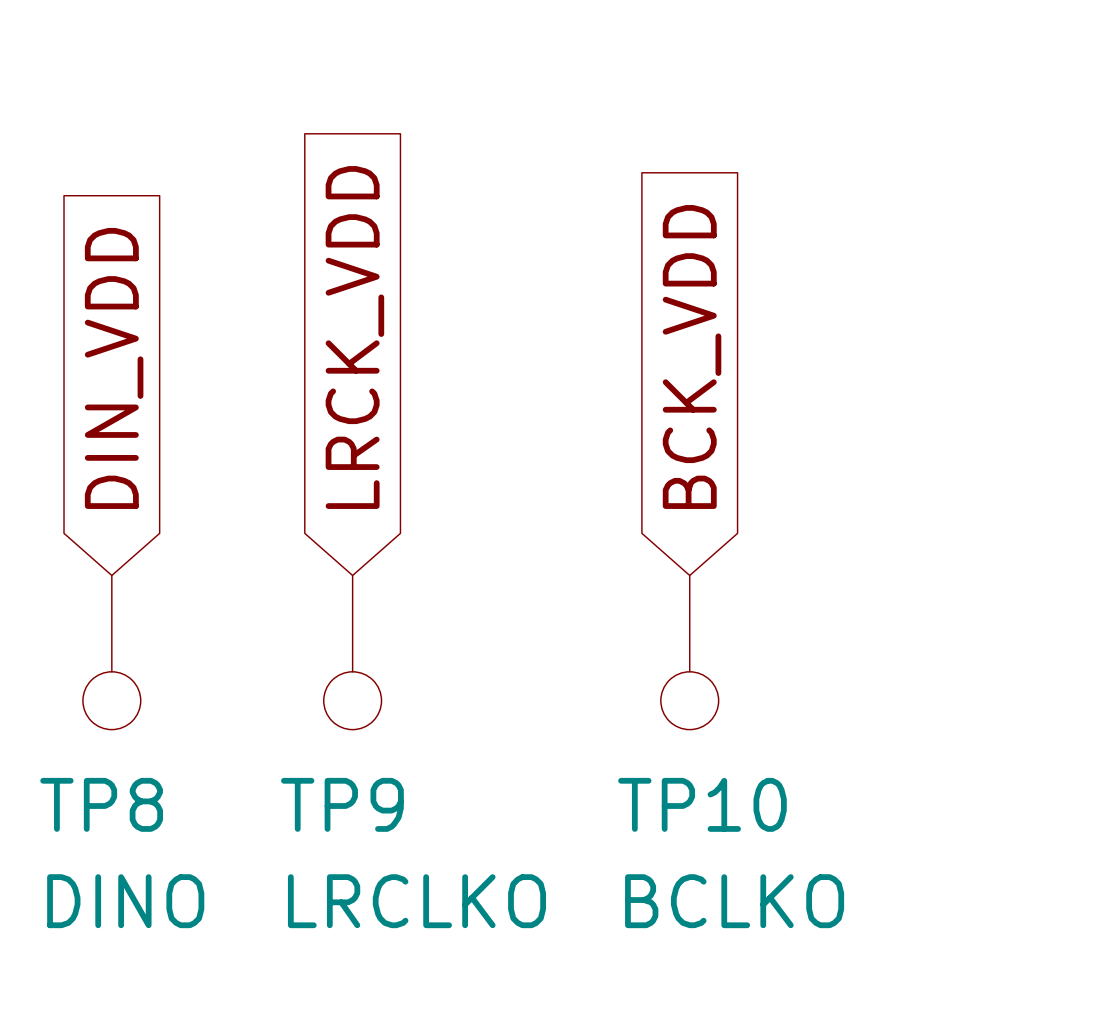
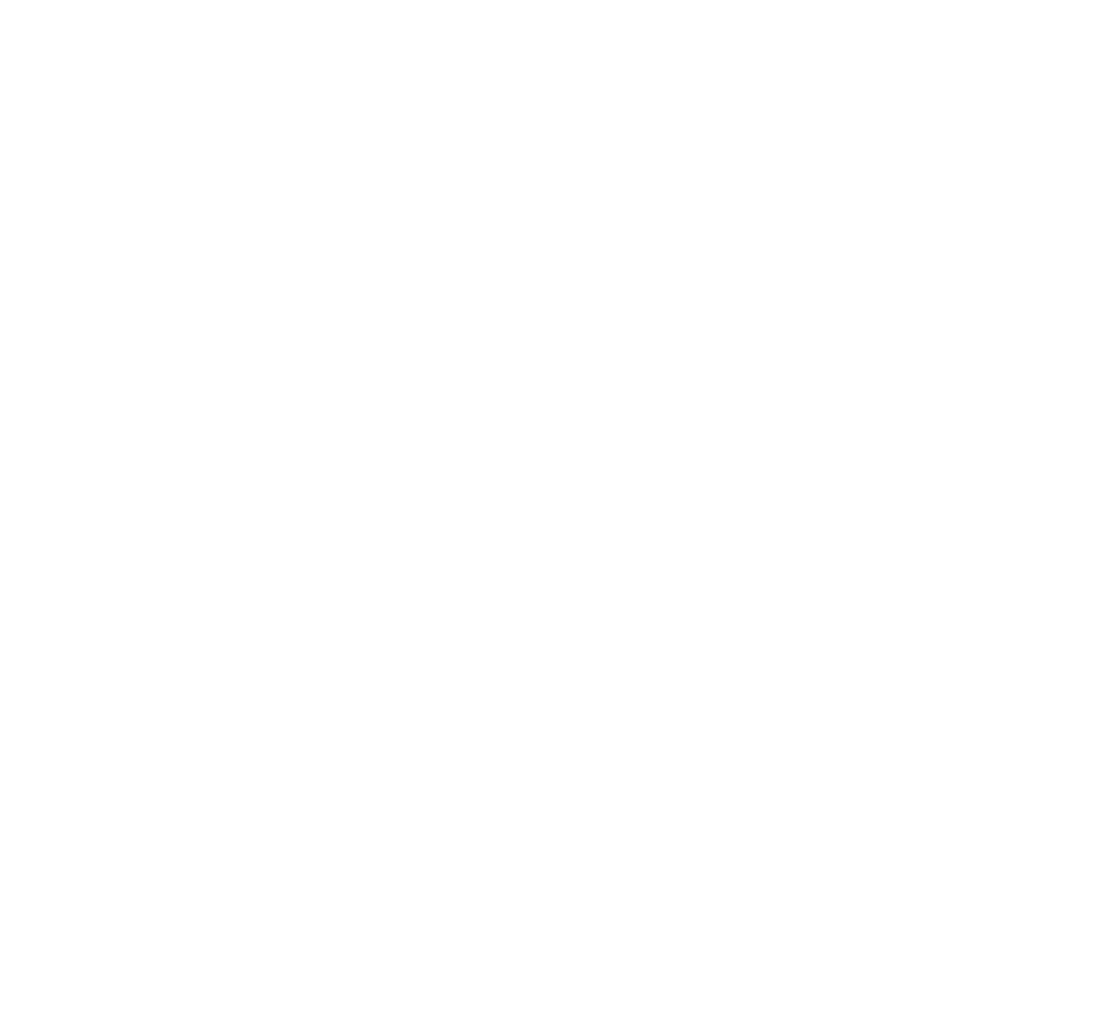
global label: LRCK_VDD (354, 337) -> none
global label: BCK_VDD (692, 356) -> none
global label: DIN_VDD (114, 368) -> none
TP8: DINO (111, 652) -> none
TP9: LRCLKO (352, 652) -> none
TP10: BCLKO (689, 652) -> none

